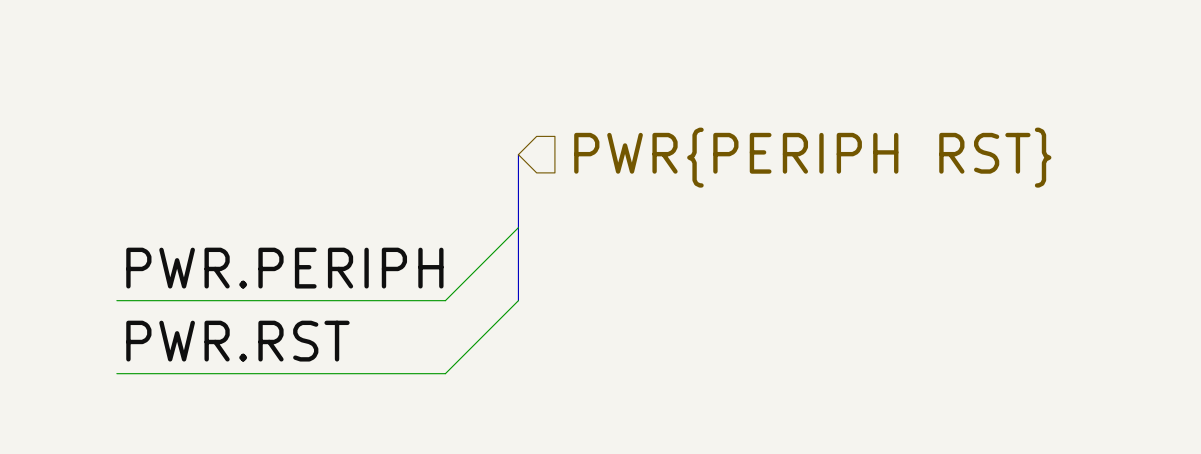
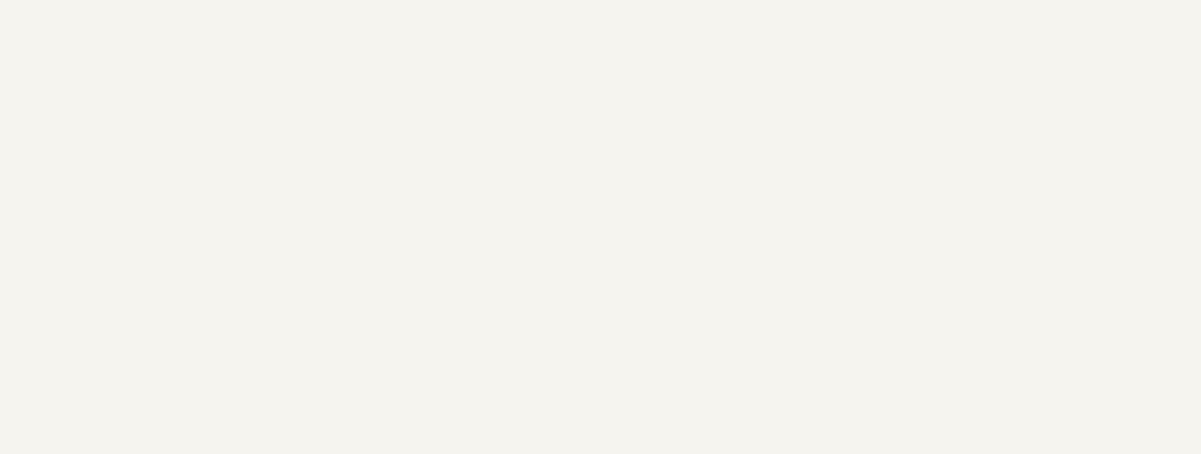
bus: (518, 154) (518, 300) -> none
hierarchical label: PWR{PERIPH RST} (812, 157) -> none
wire: (518, 227) (445, 300) (116, 300) -> none
label: PWR.PERIPH (284, 268) -> none
wire: (518, 300) (445, 373) (116, 373) -> none
label: PWR.RST (237, 341) -> none

